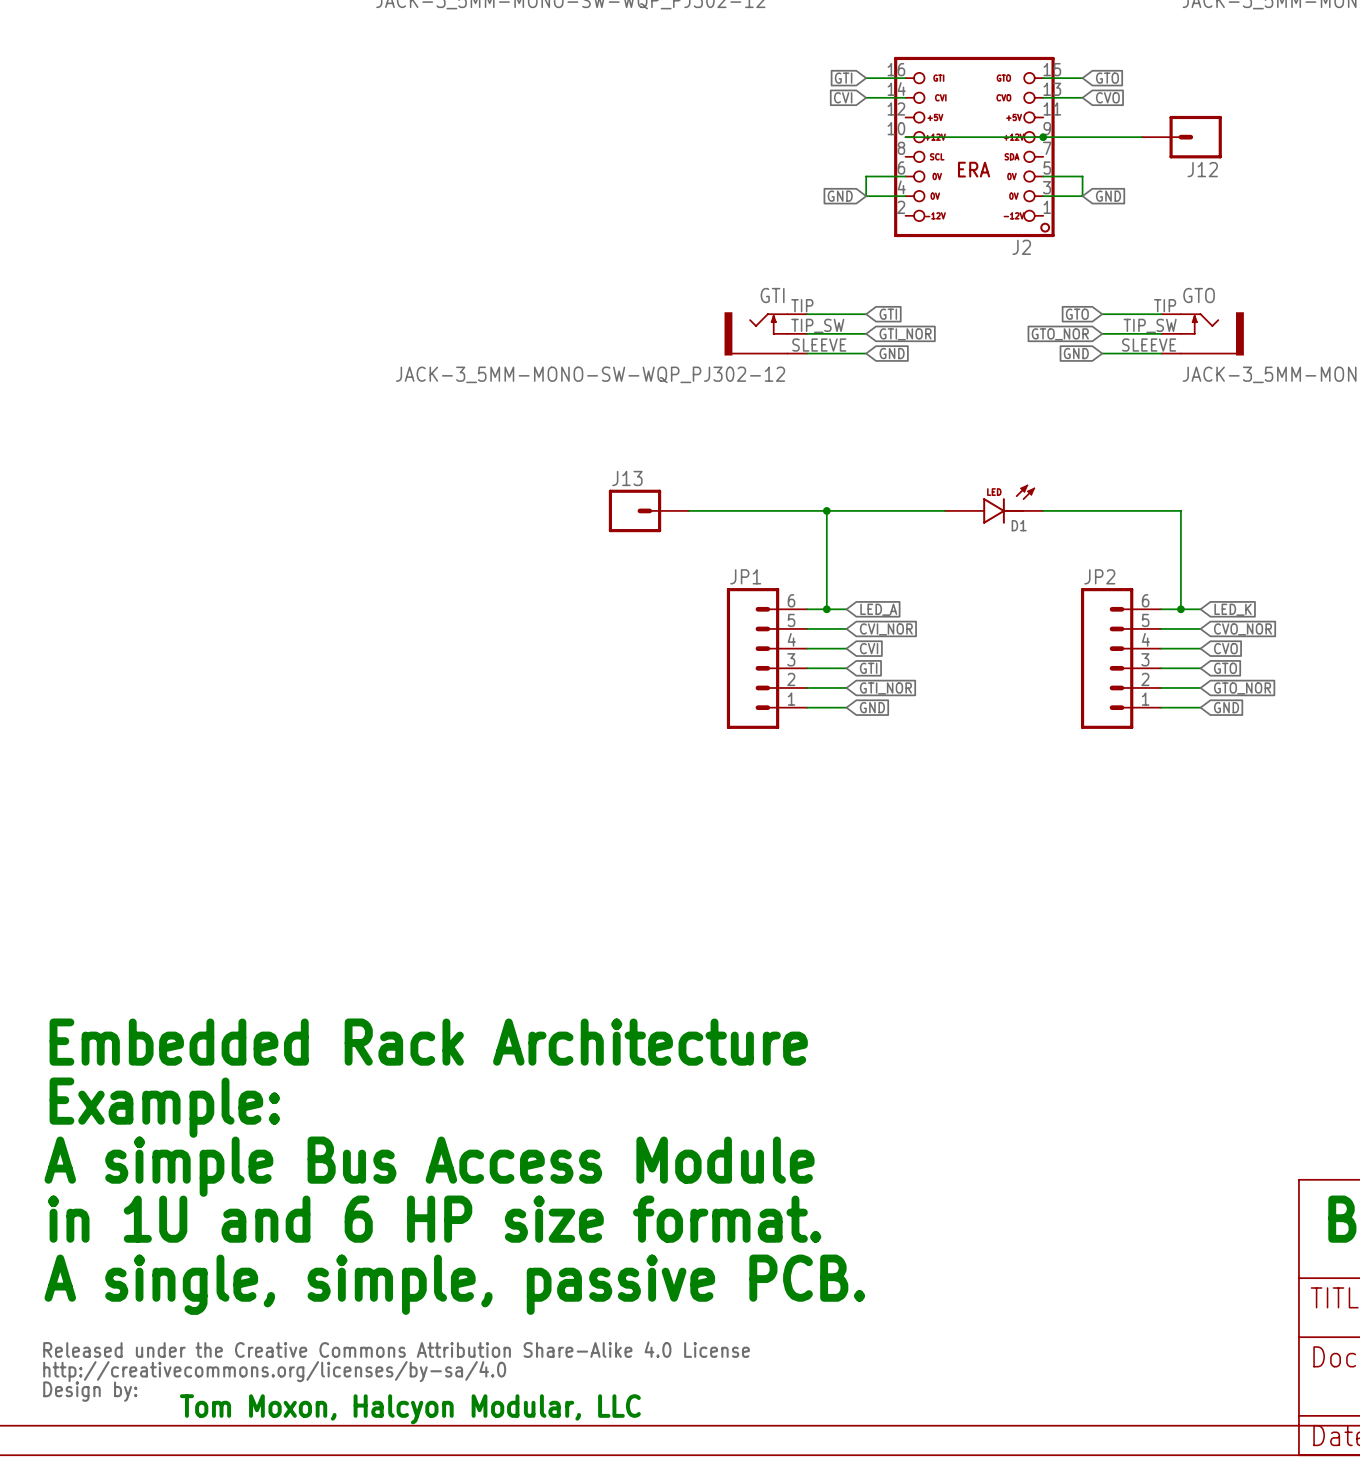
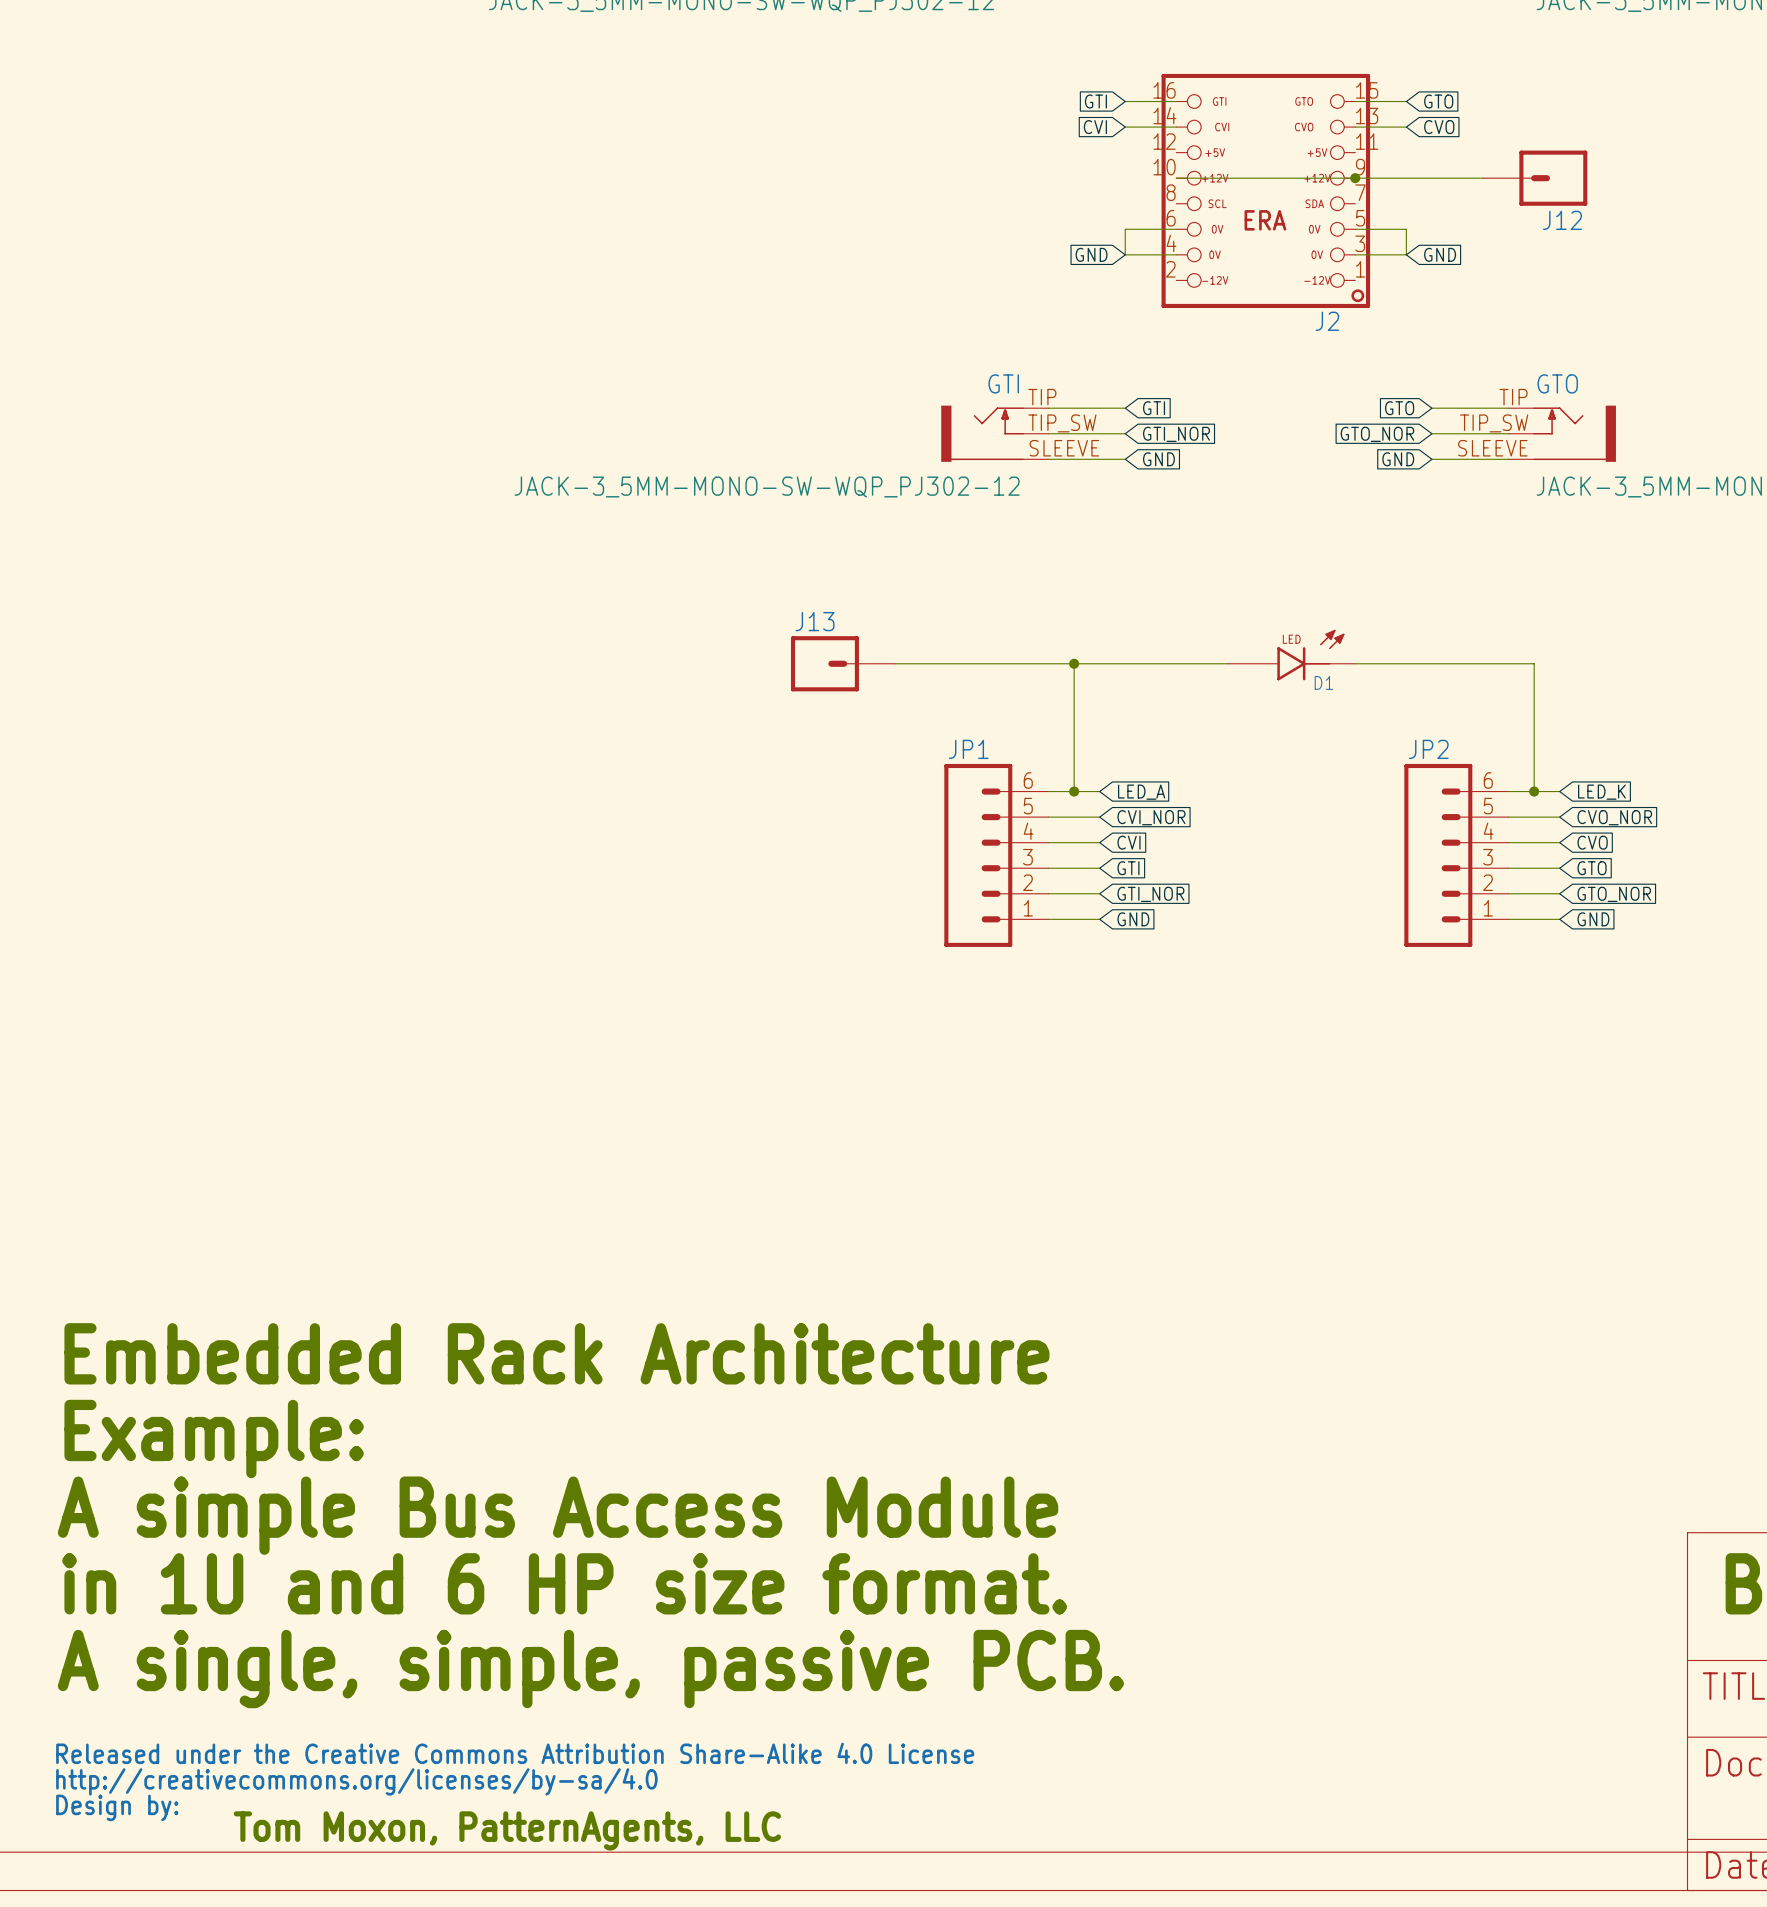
text: Tom Moxon, Halcyon Modular, LLC (410, 1409) -> Tom Moxon, PatternAgents, LLC (507, 1830)

